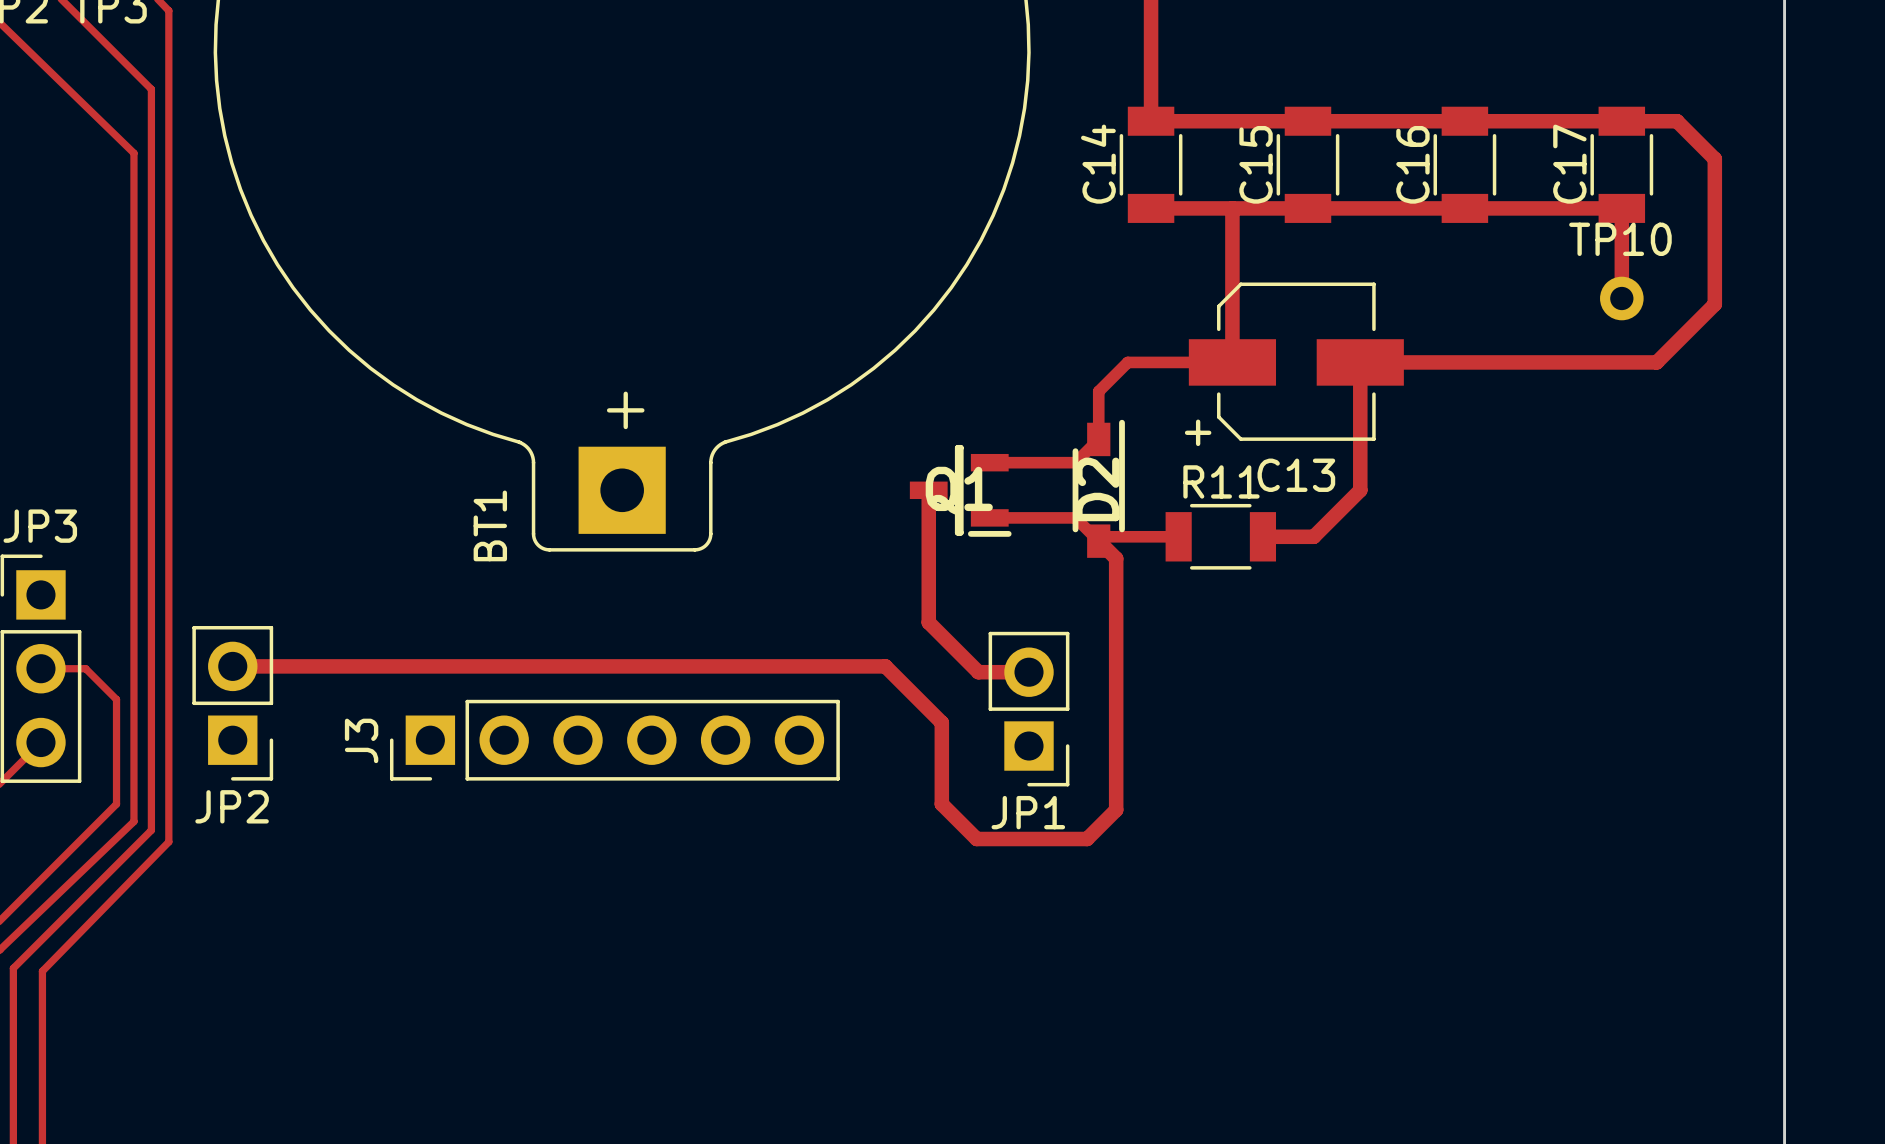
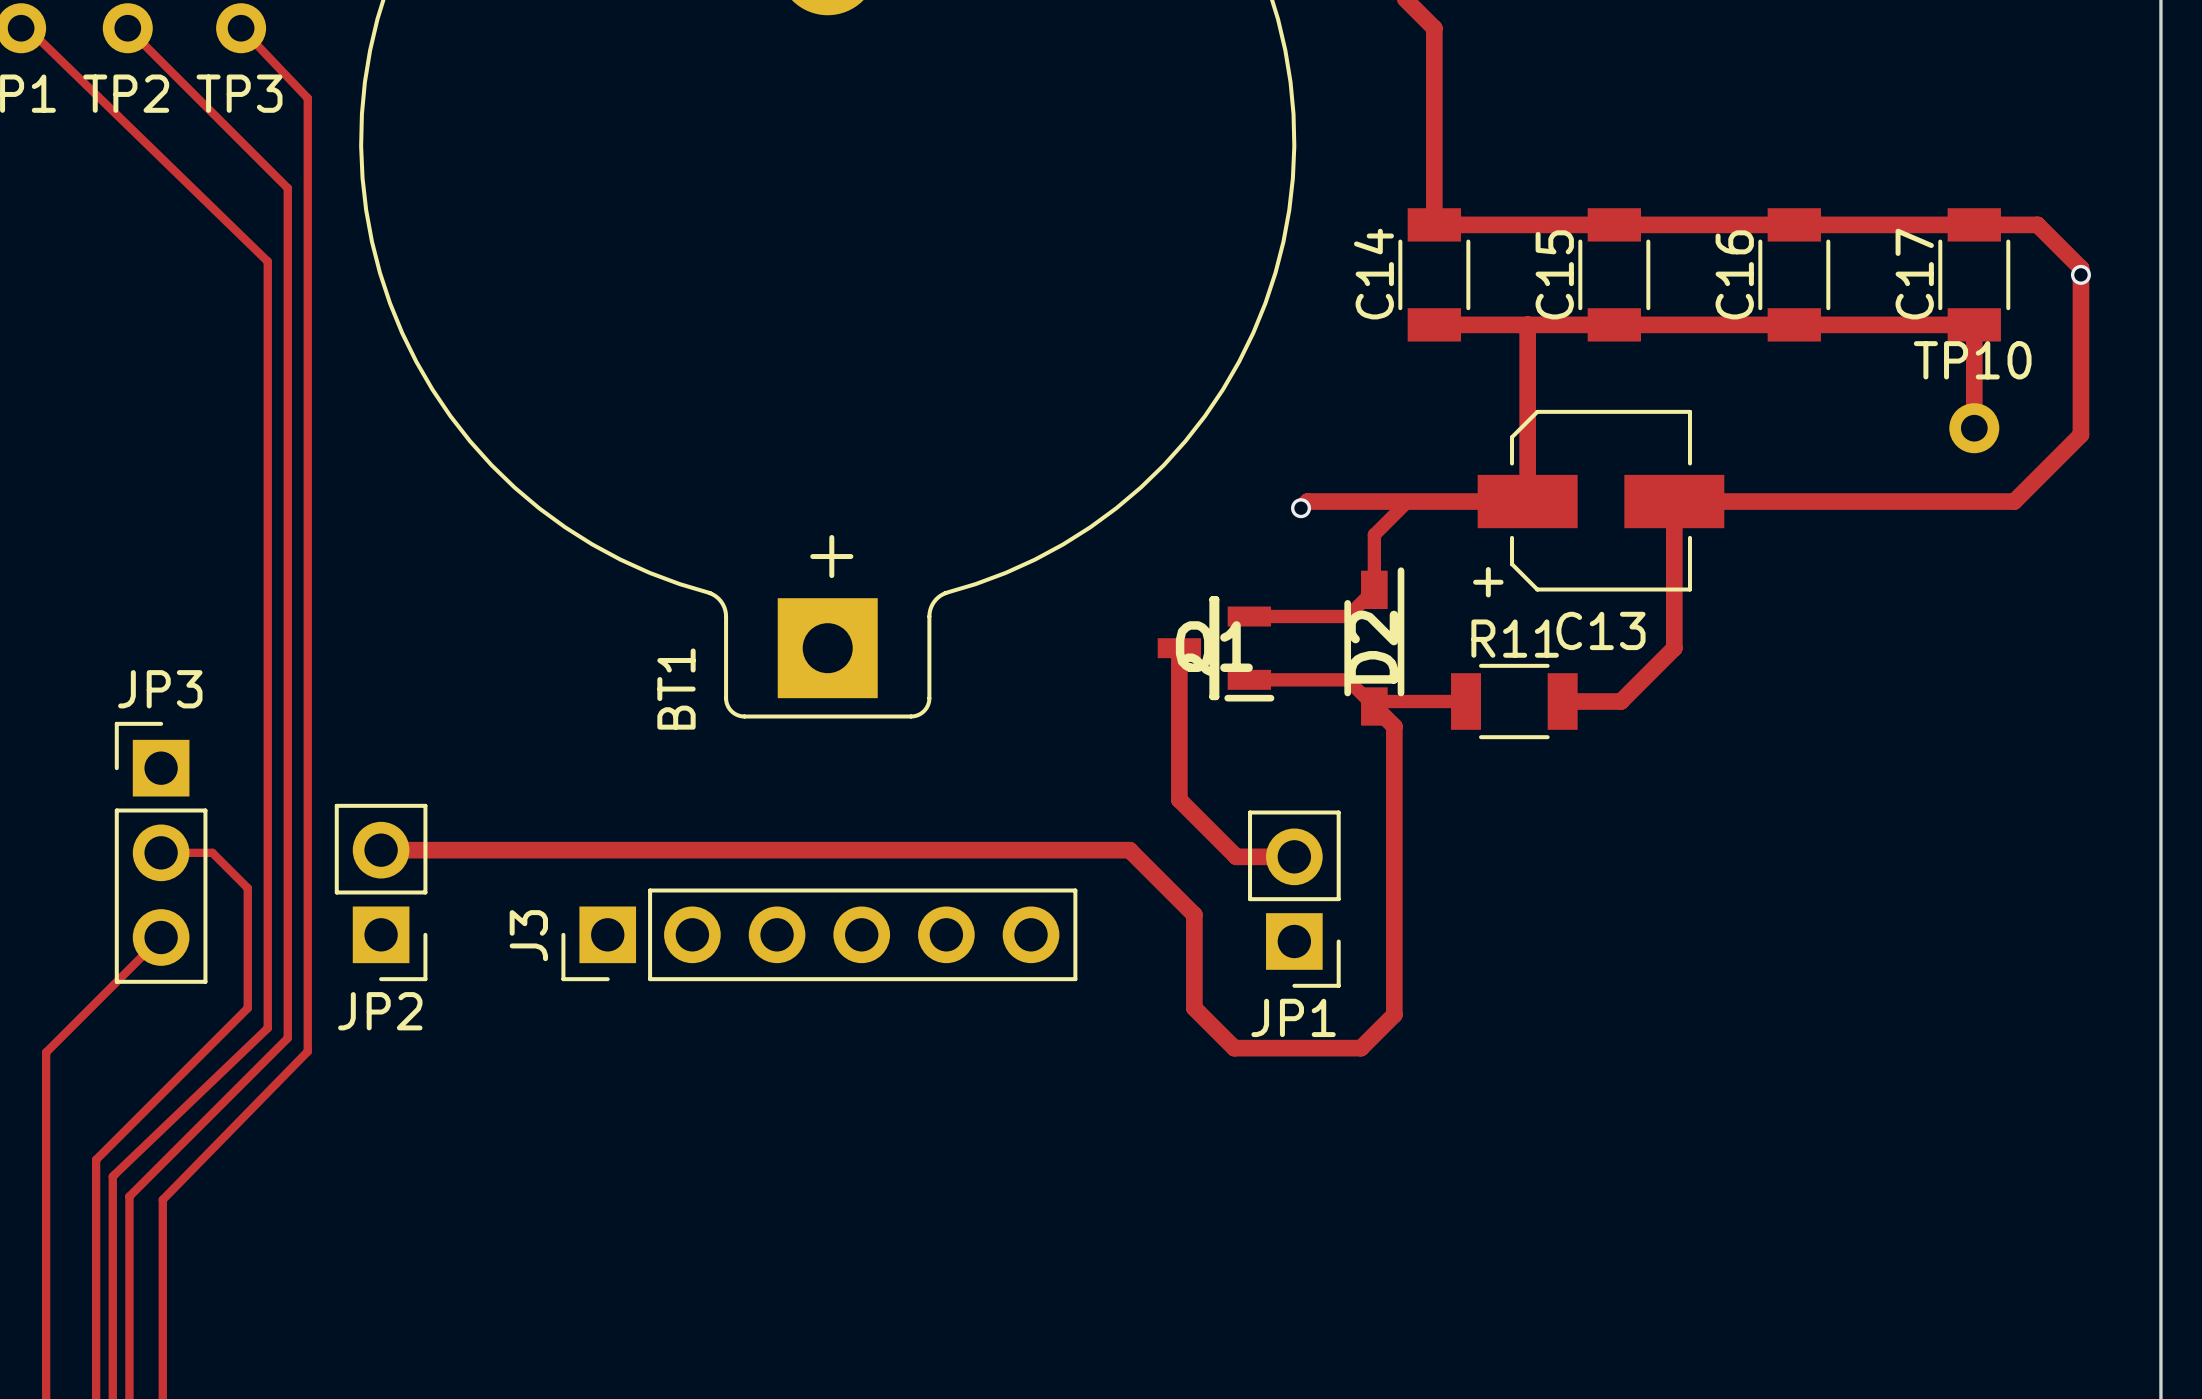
via: none -> (2080, 274)
track: none -> (1527, 501) (1307, 501) (1301, 508)
via: none -> (1301, 508)

